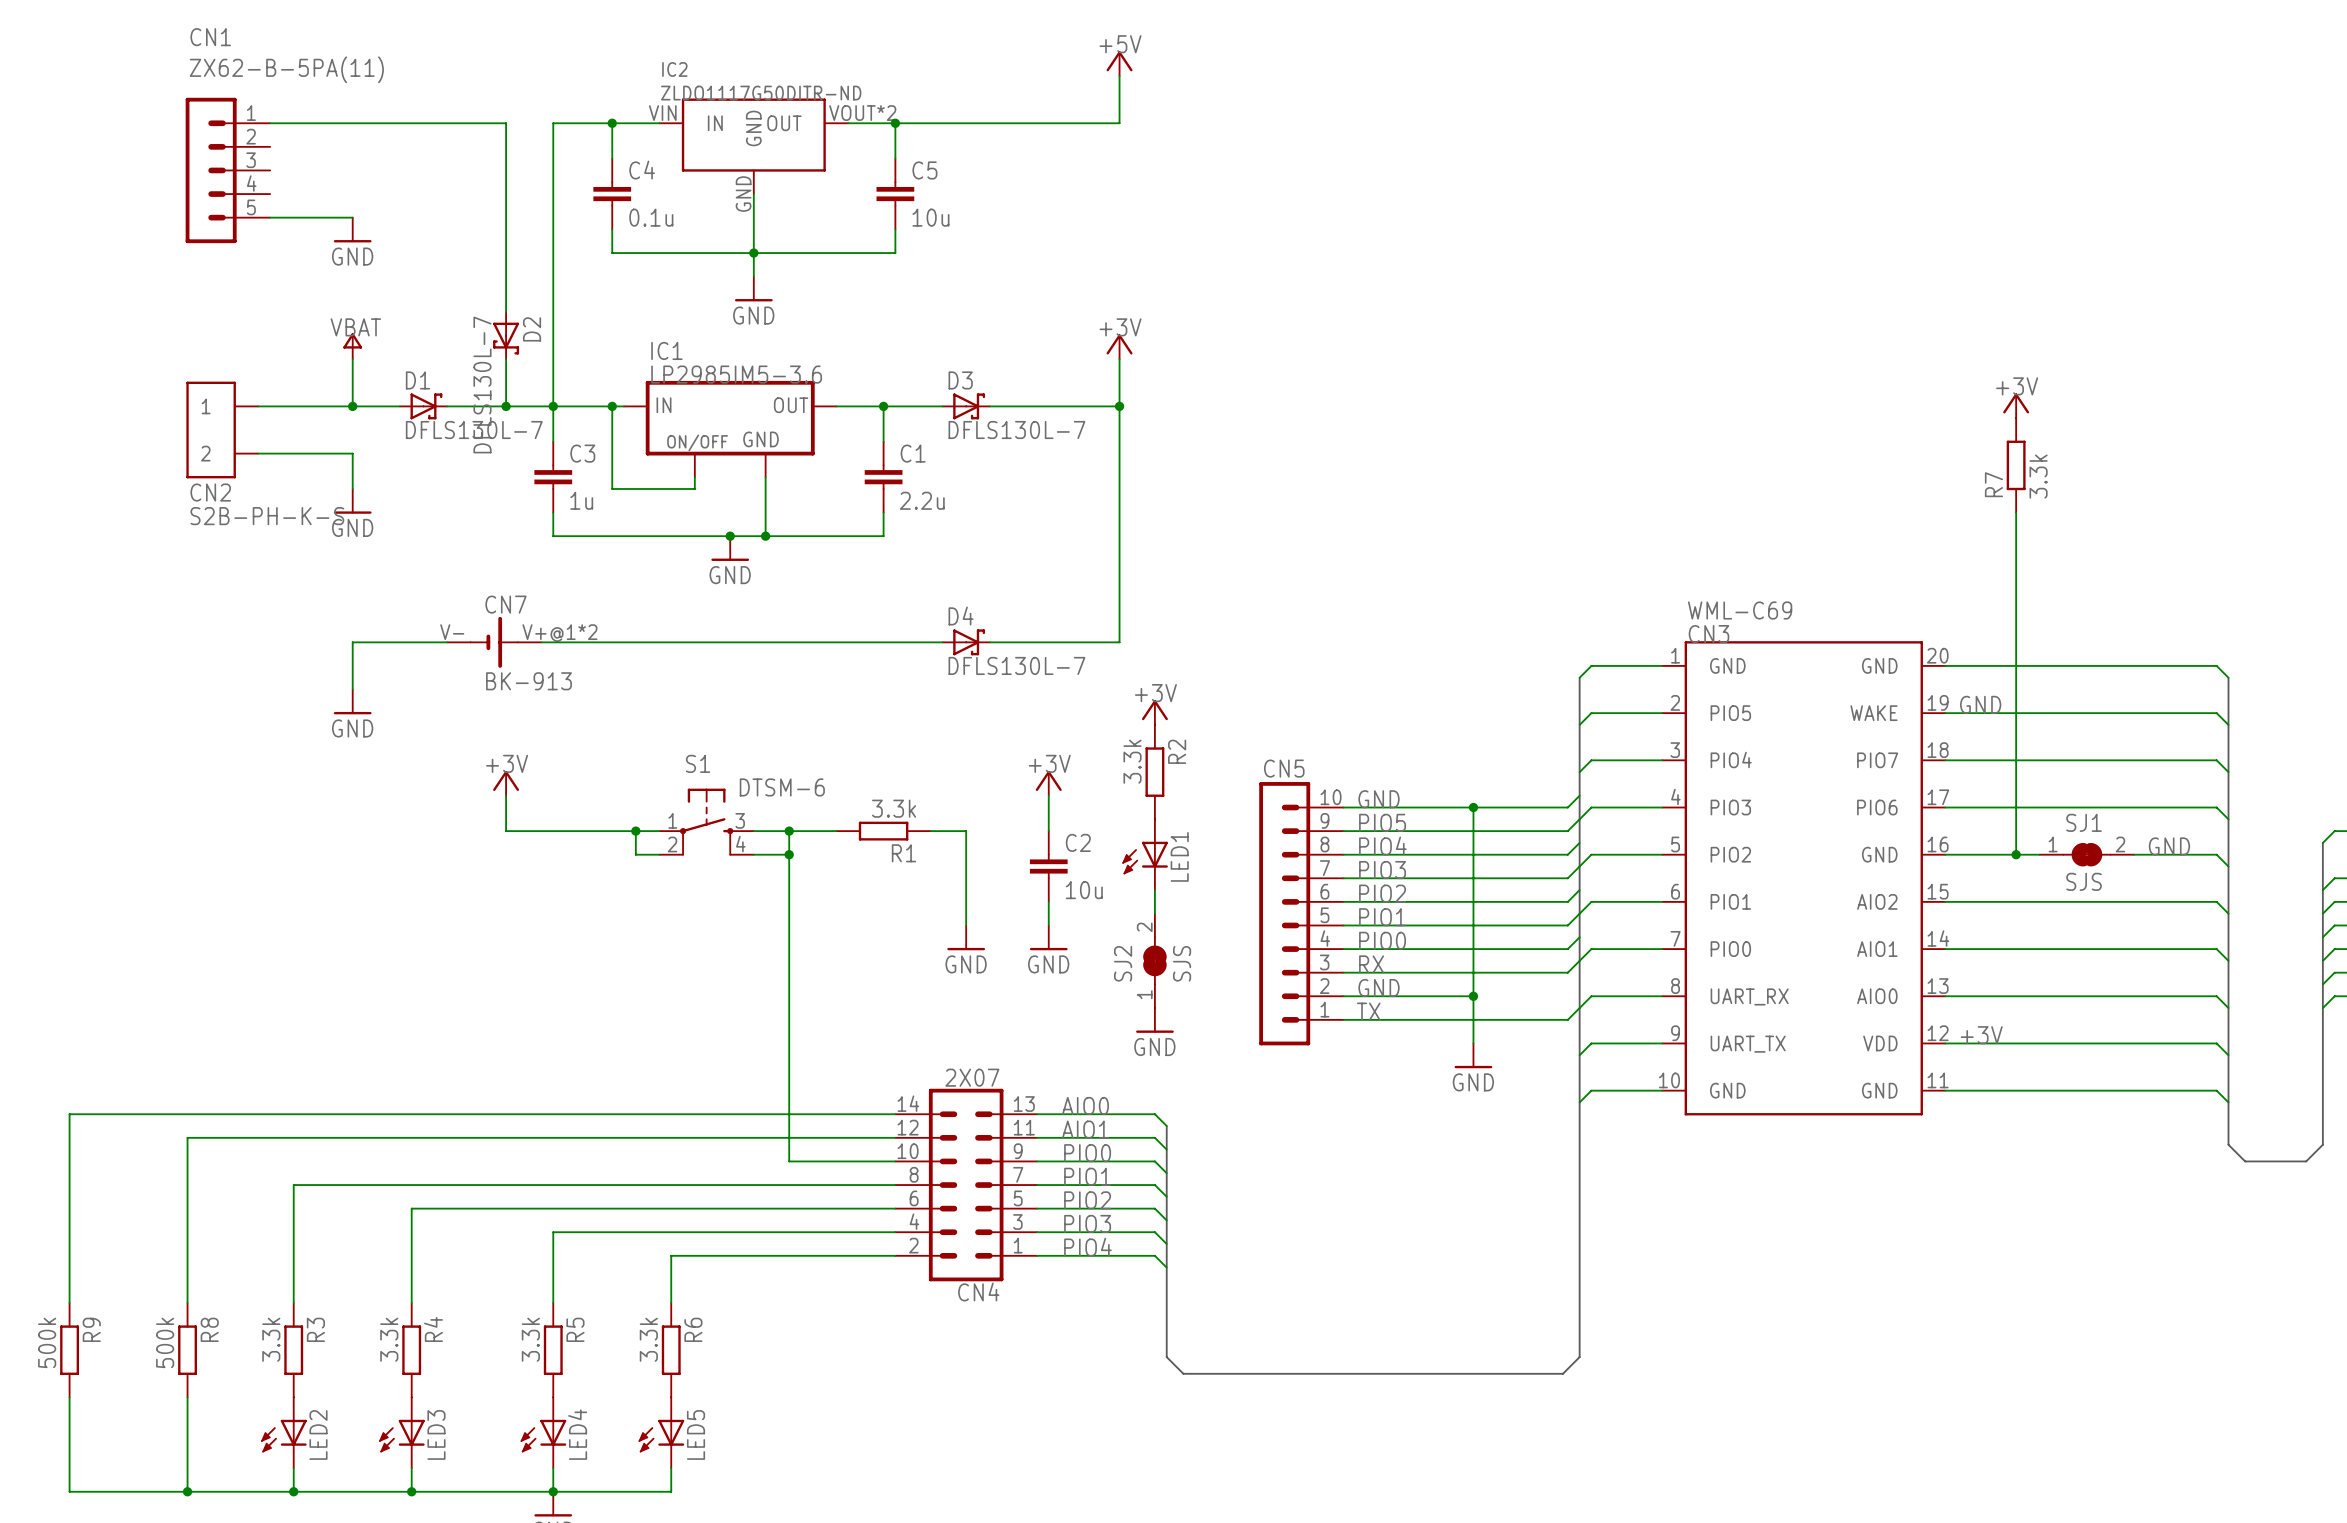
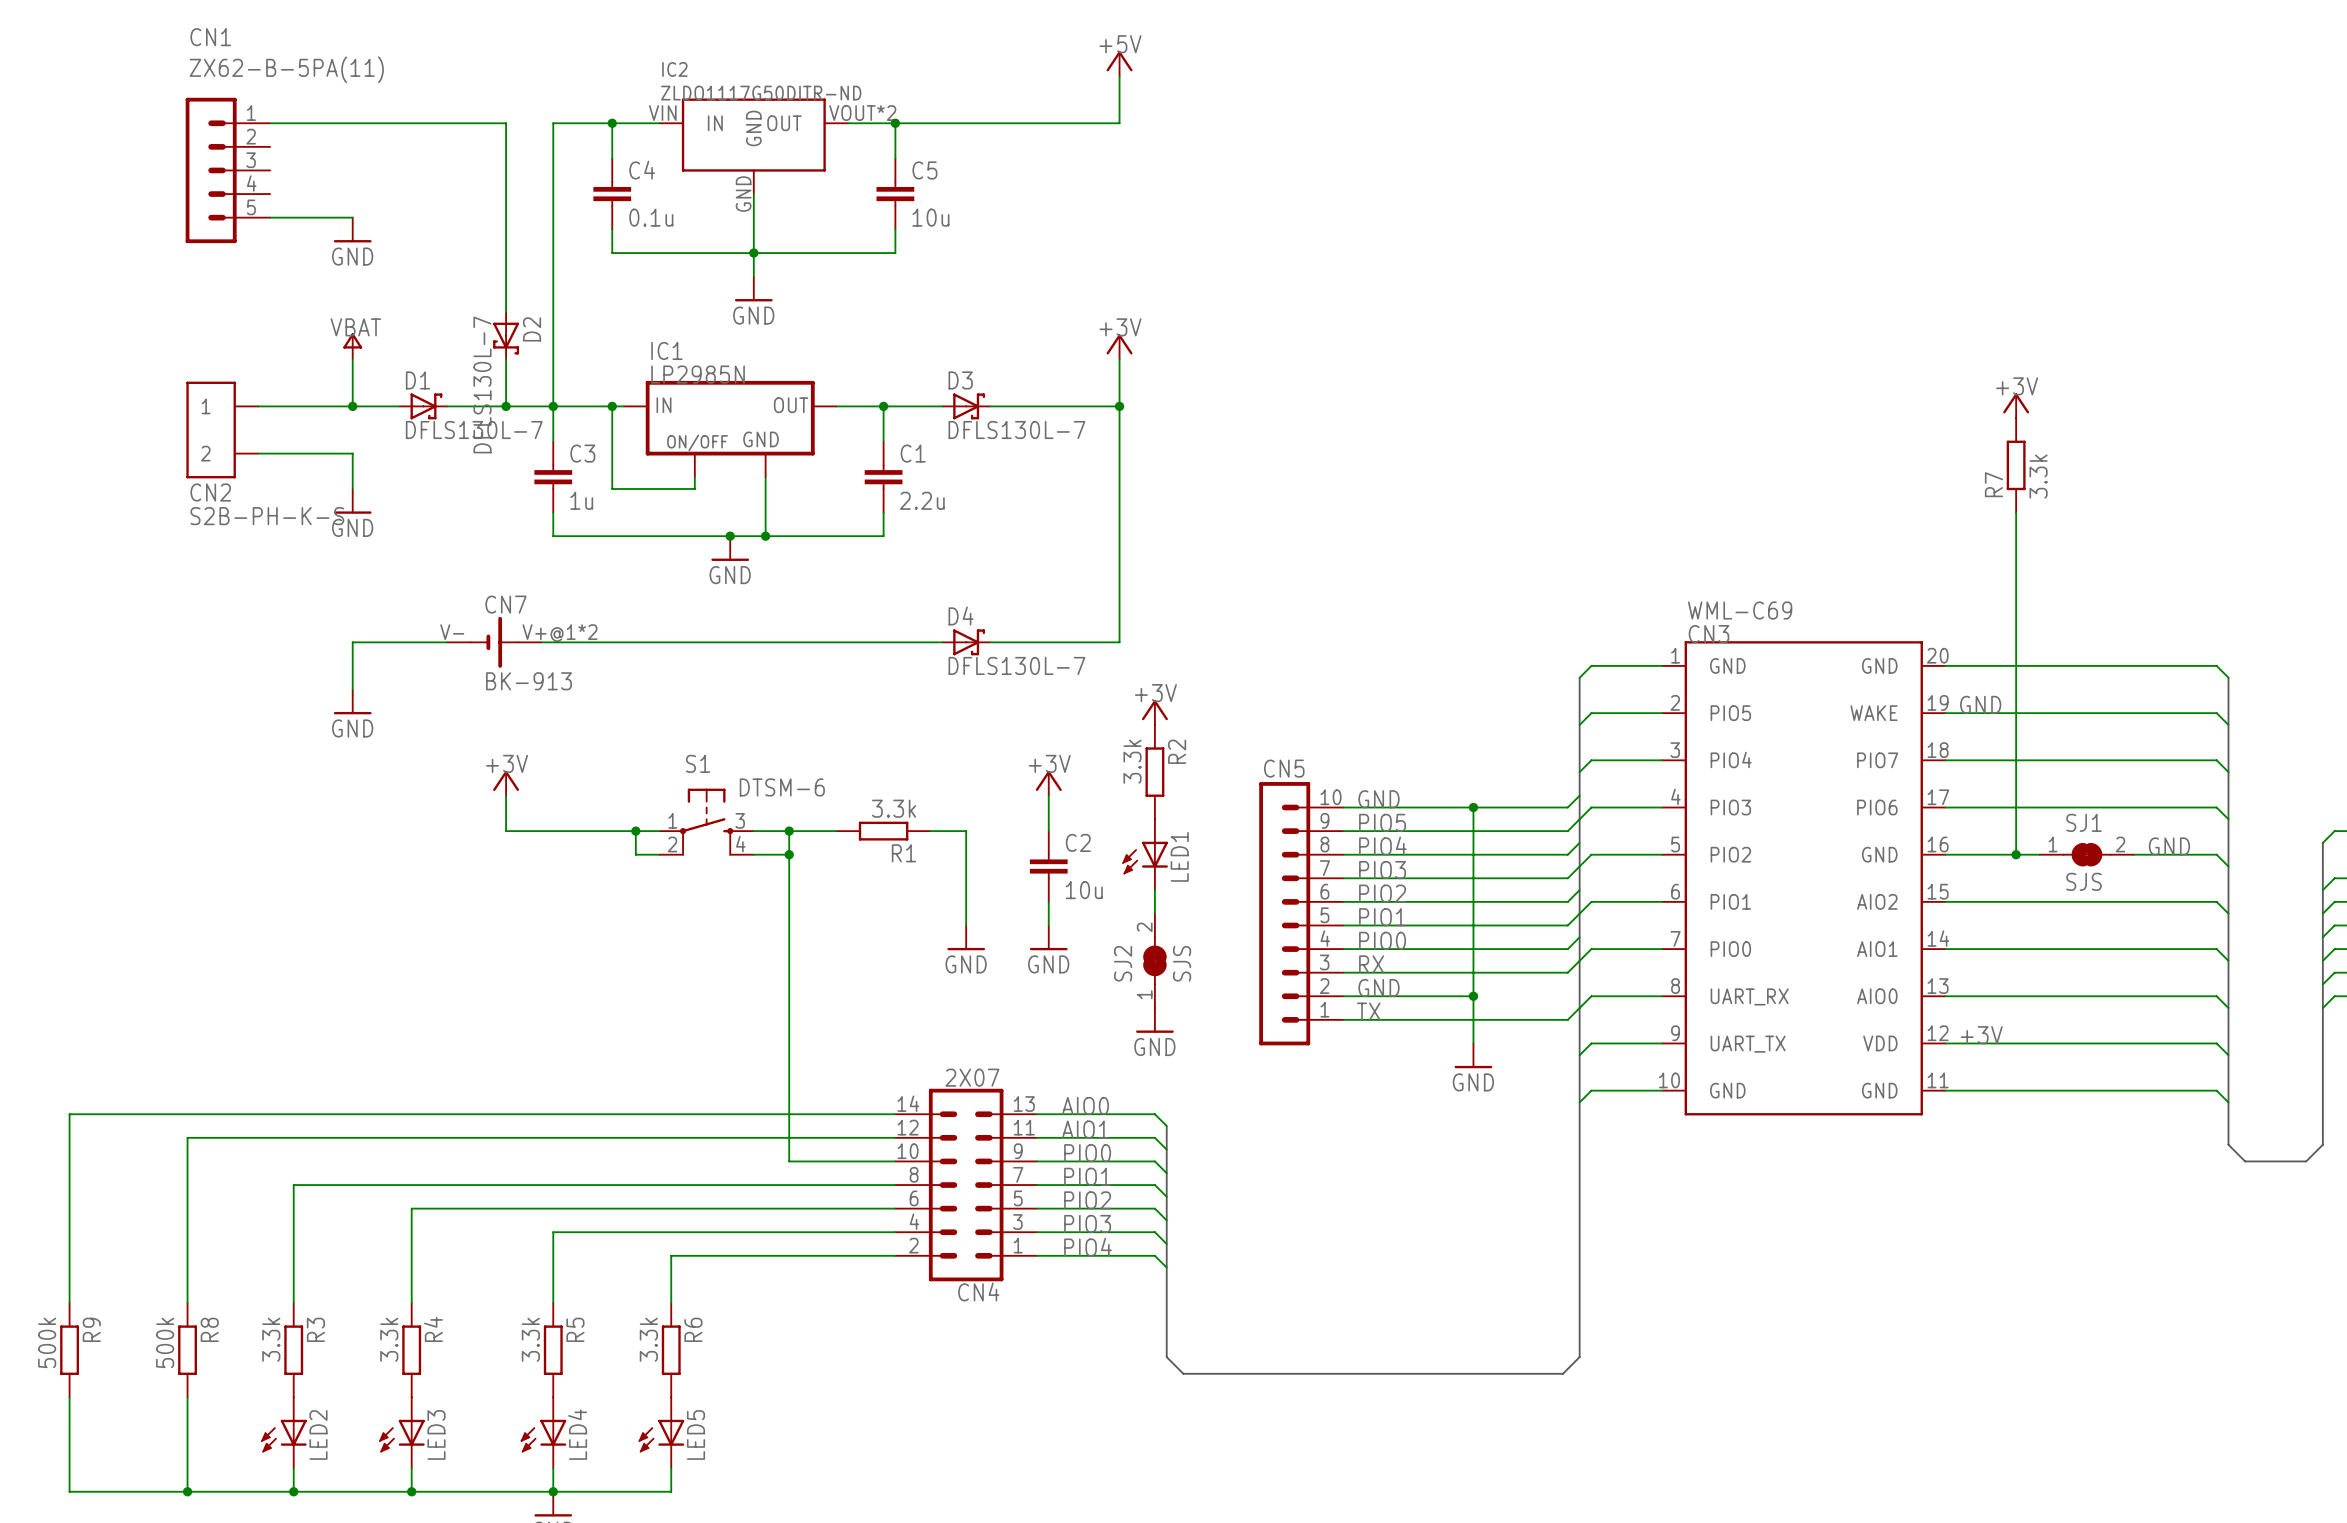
IC1 value: LP2985IM5-3.6 (736, 374) -> LP2985N (698, 374)

